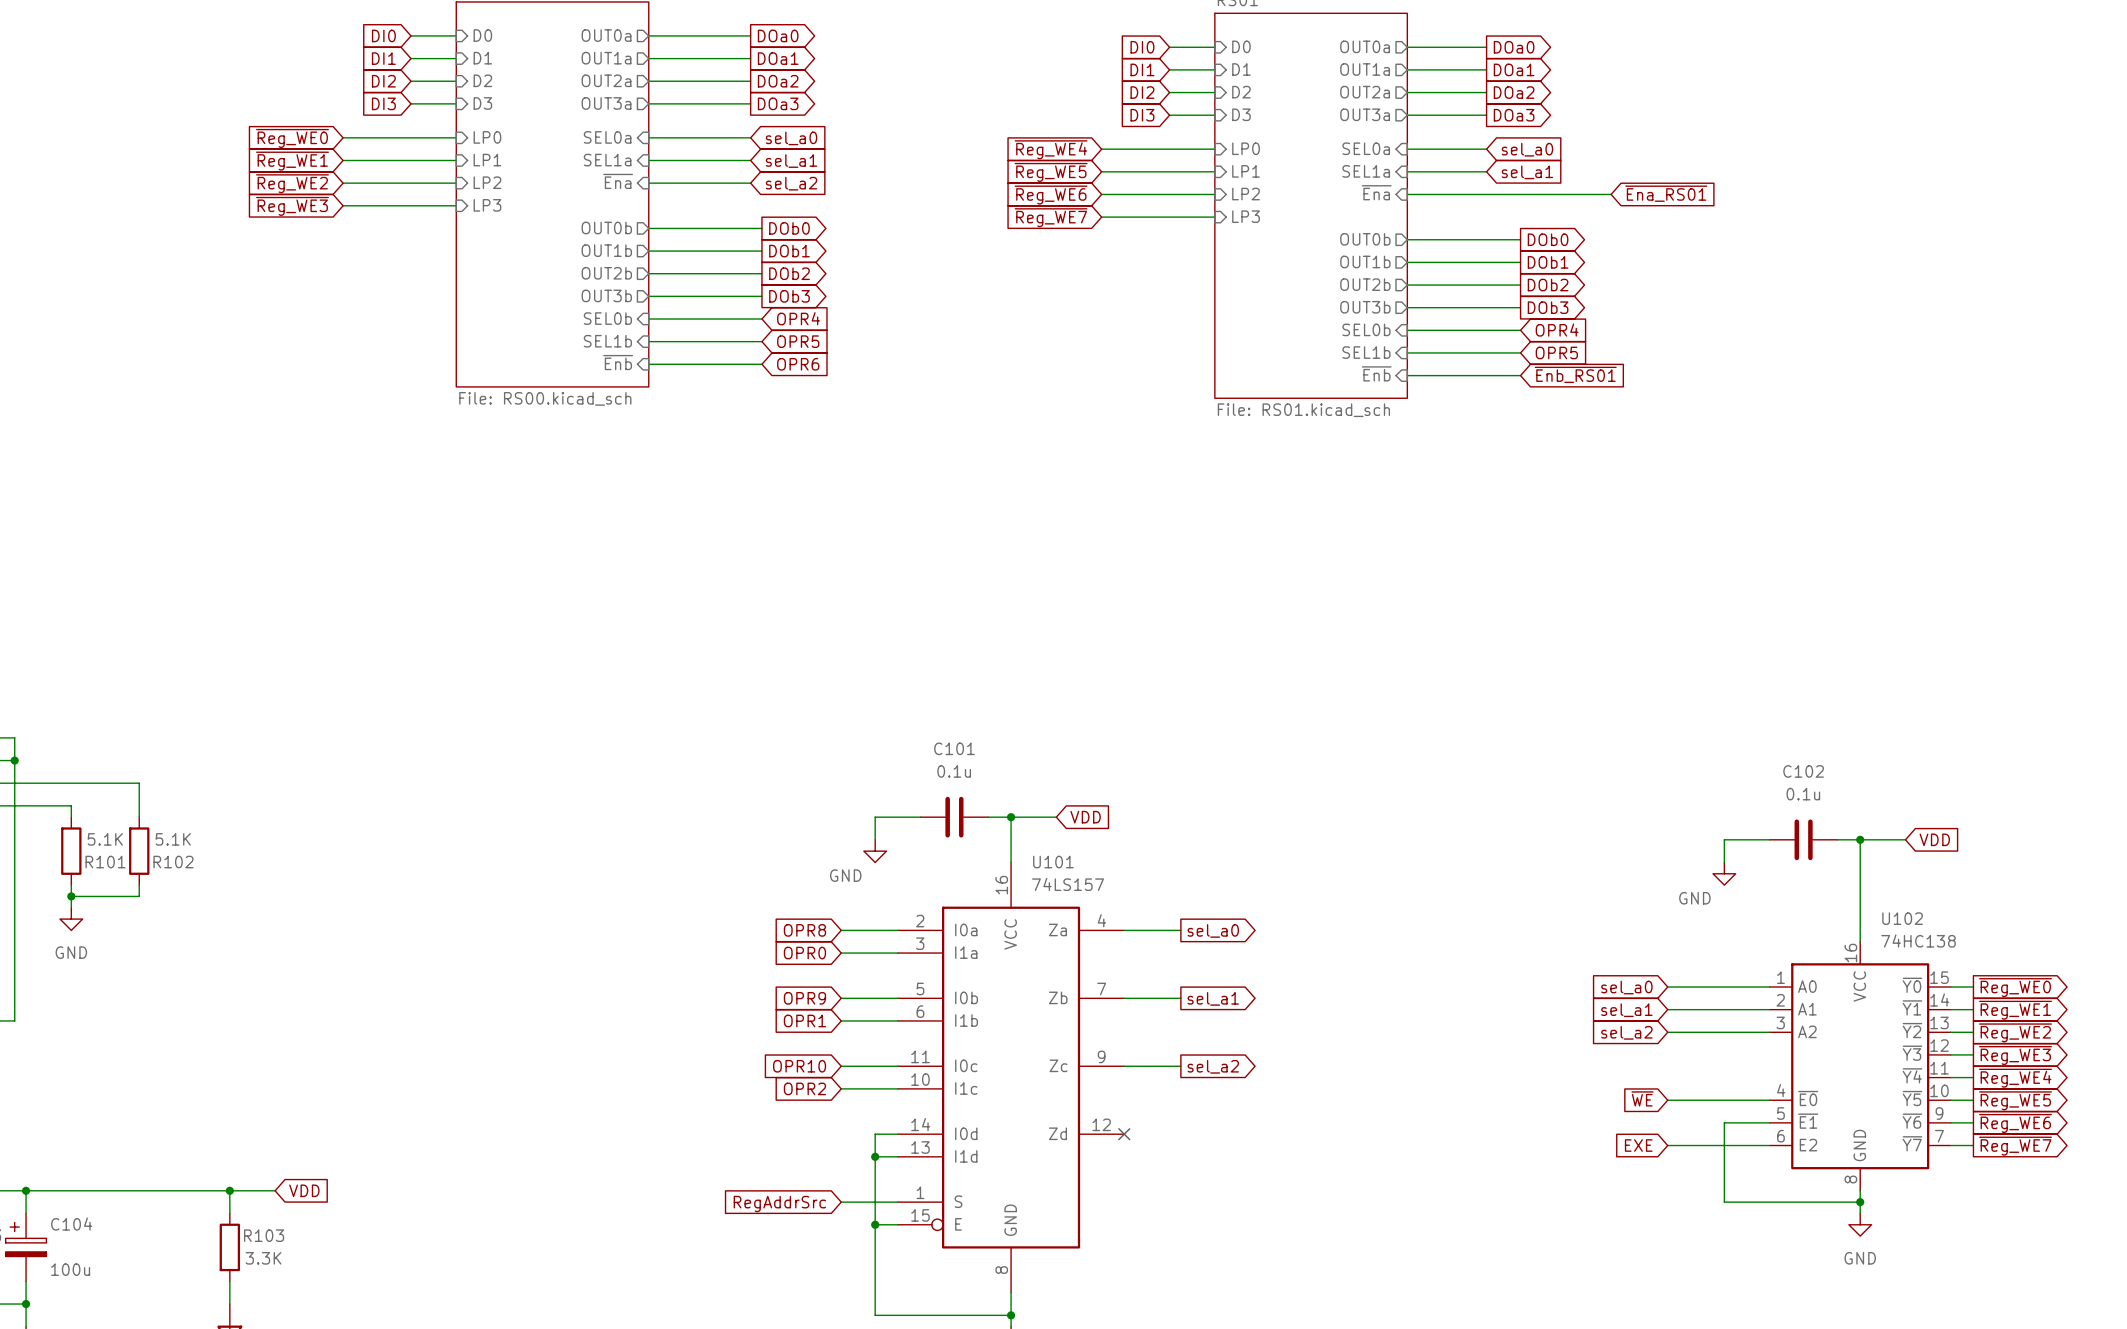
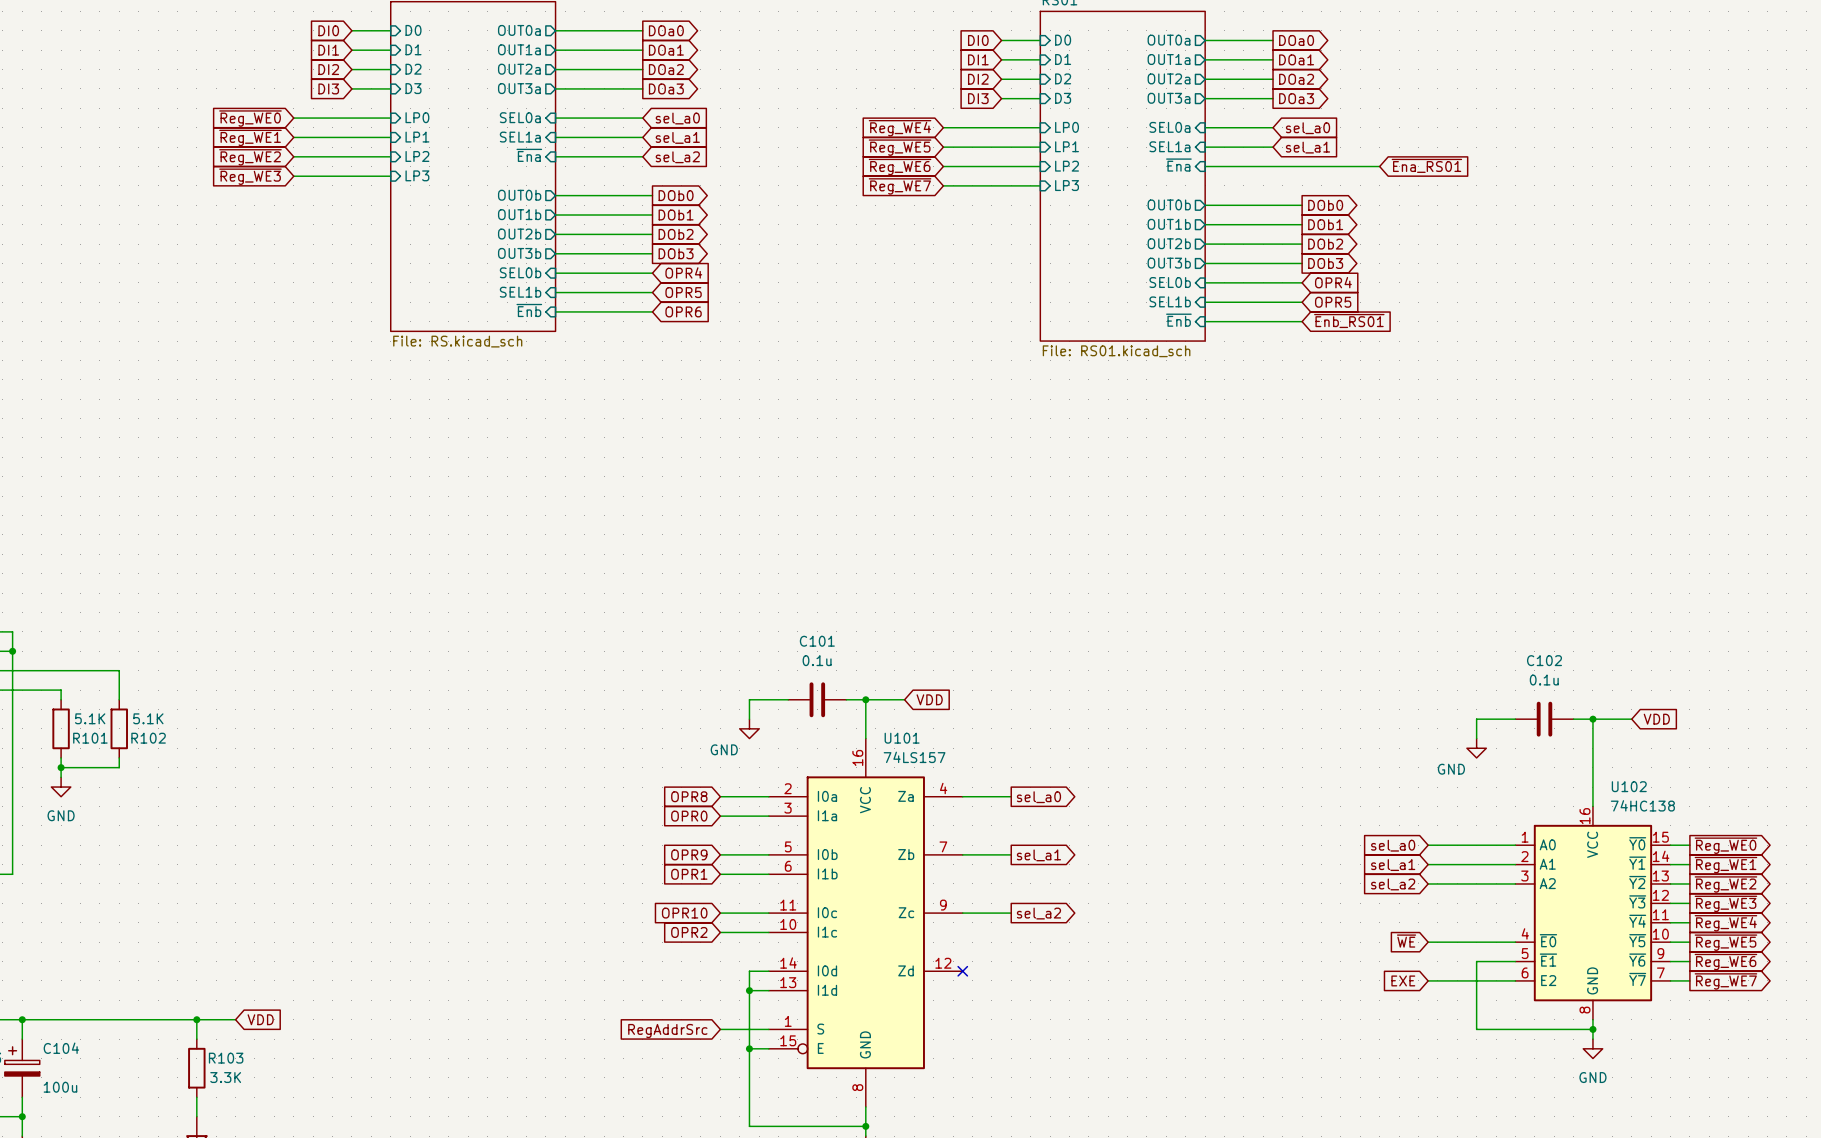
sheet value: File: RS00.kicad_sch (545, 398) -> File: RS.kicad_sch (457, 341)

